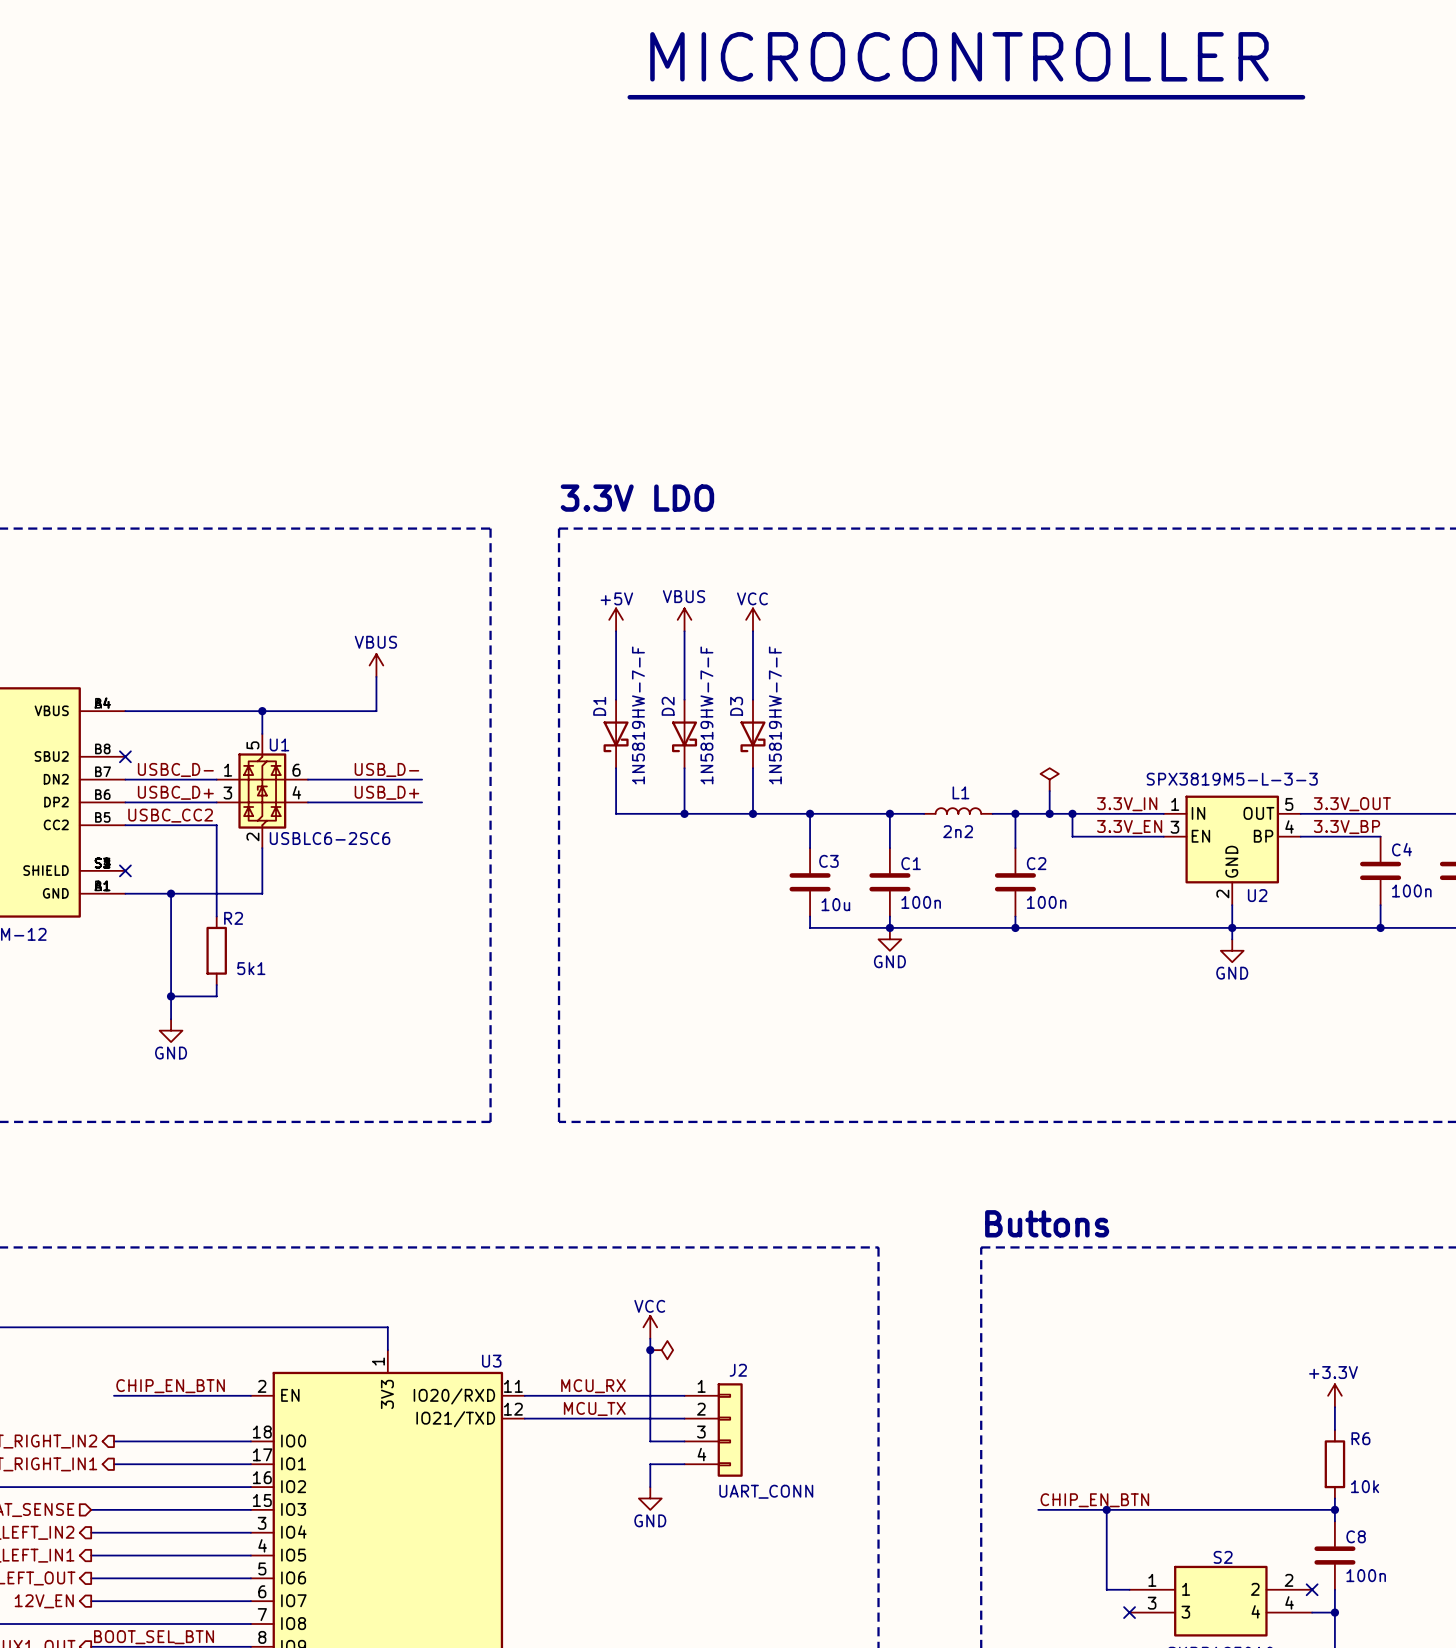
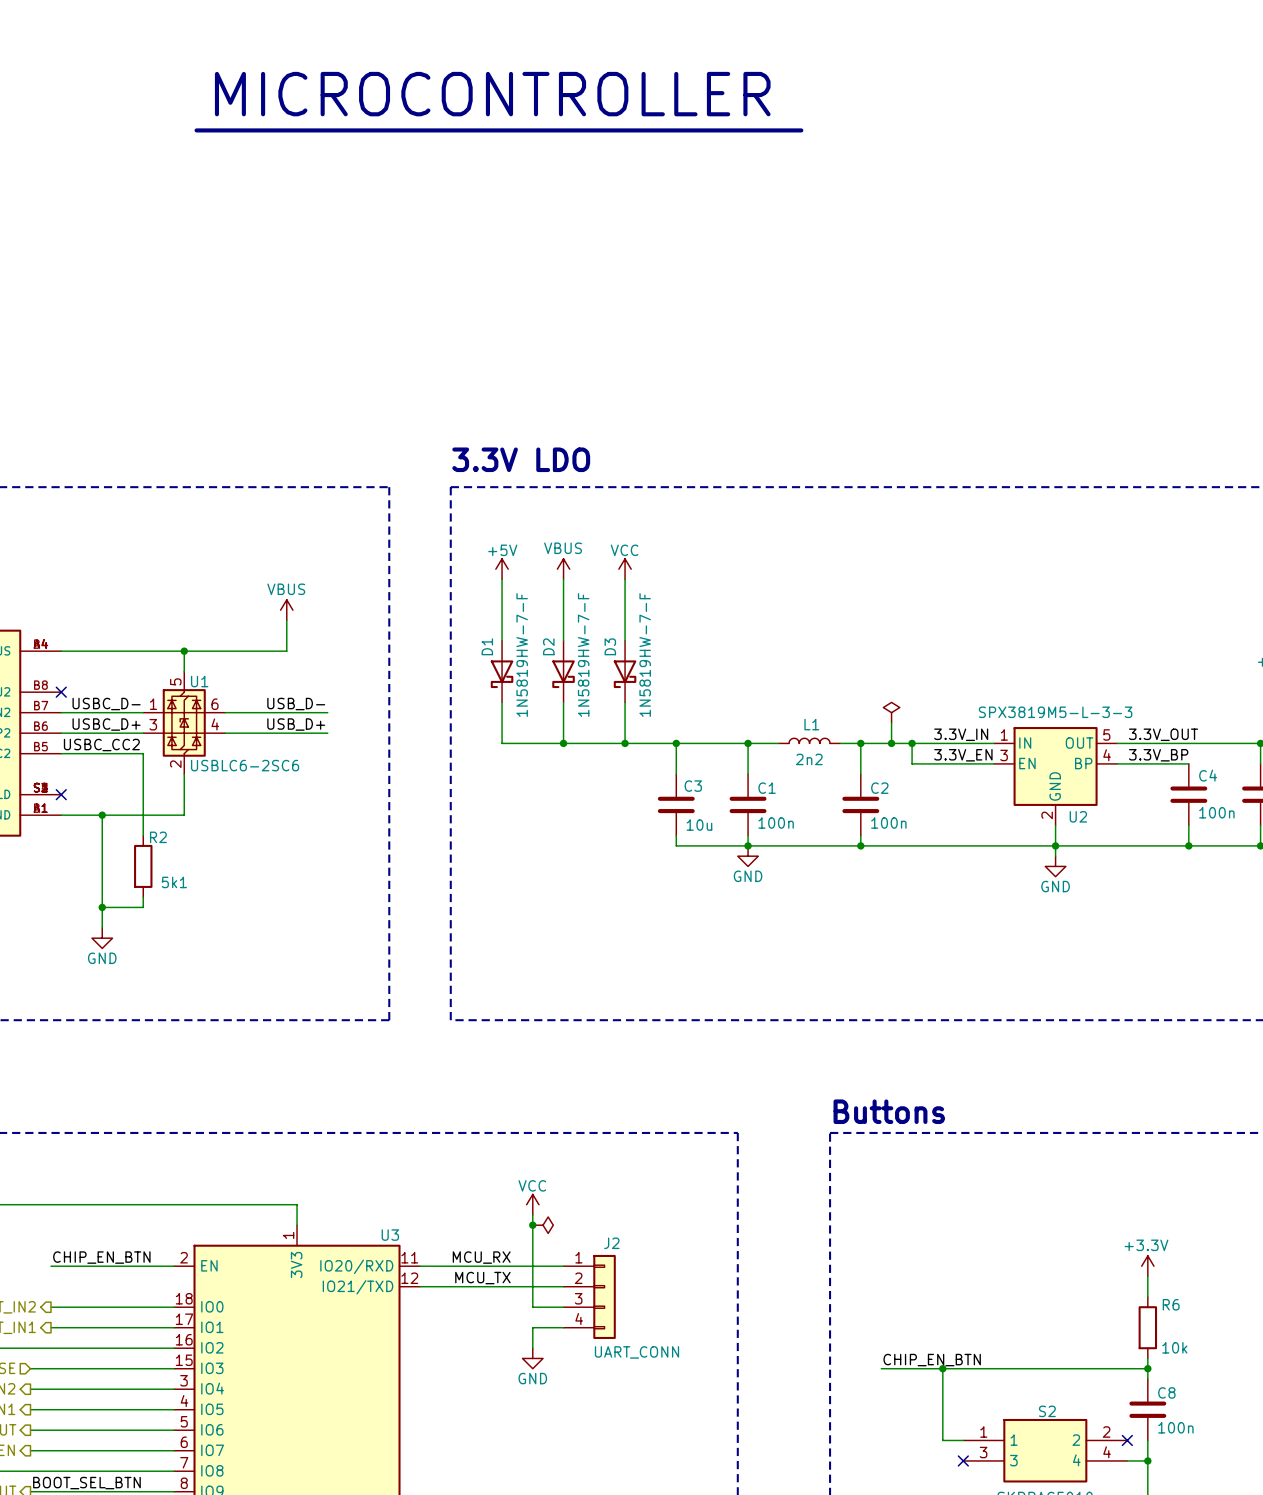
text: MICROCONTROLLER (959, 56) -> none
text: none -> MICROCONTROLLER (492, 94)
line: (629, 97) (1302, 97) -> none
line: none -> (196, 130) (801, 130)

